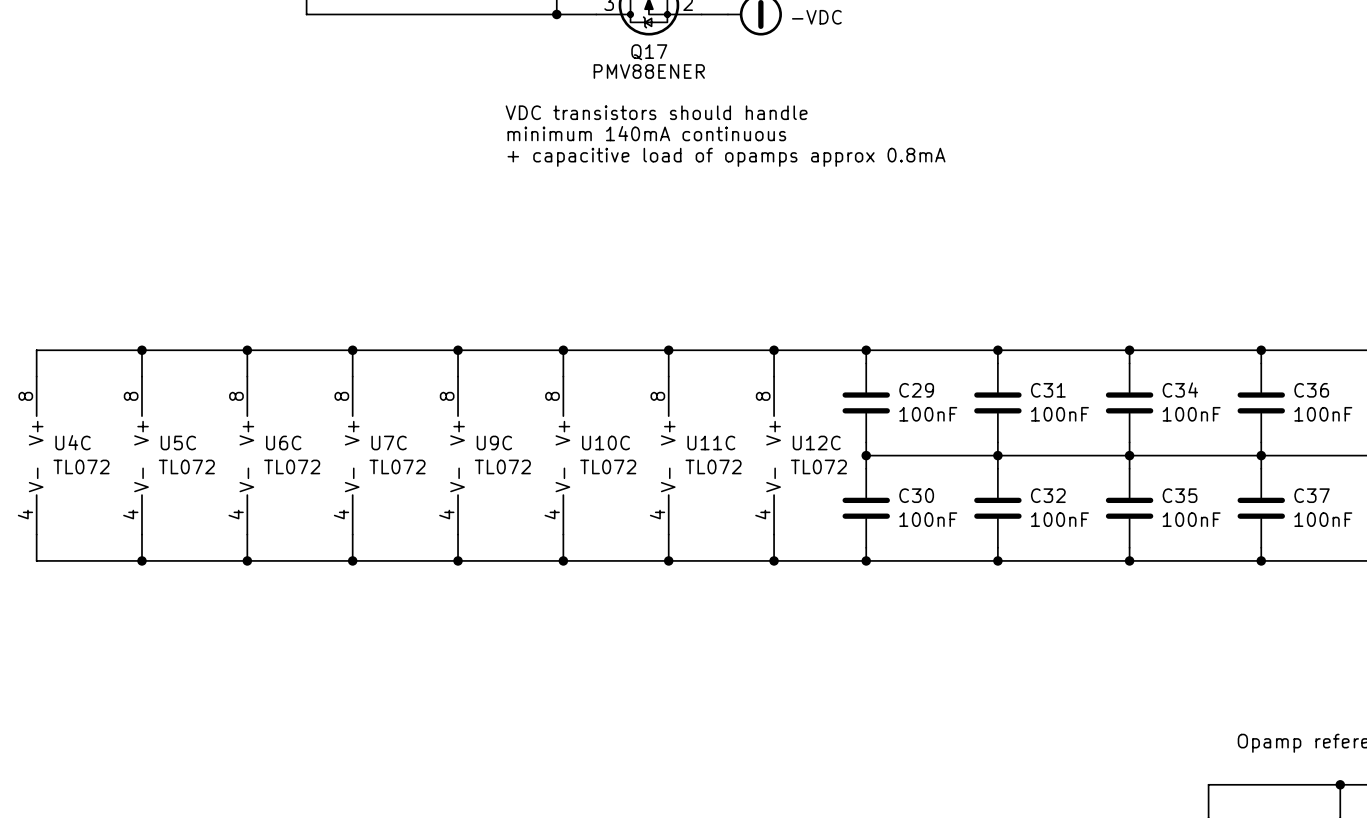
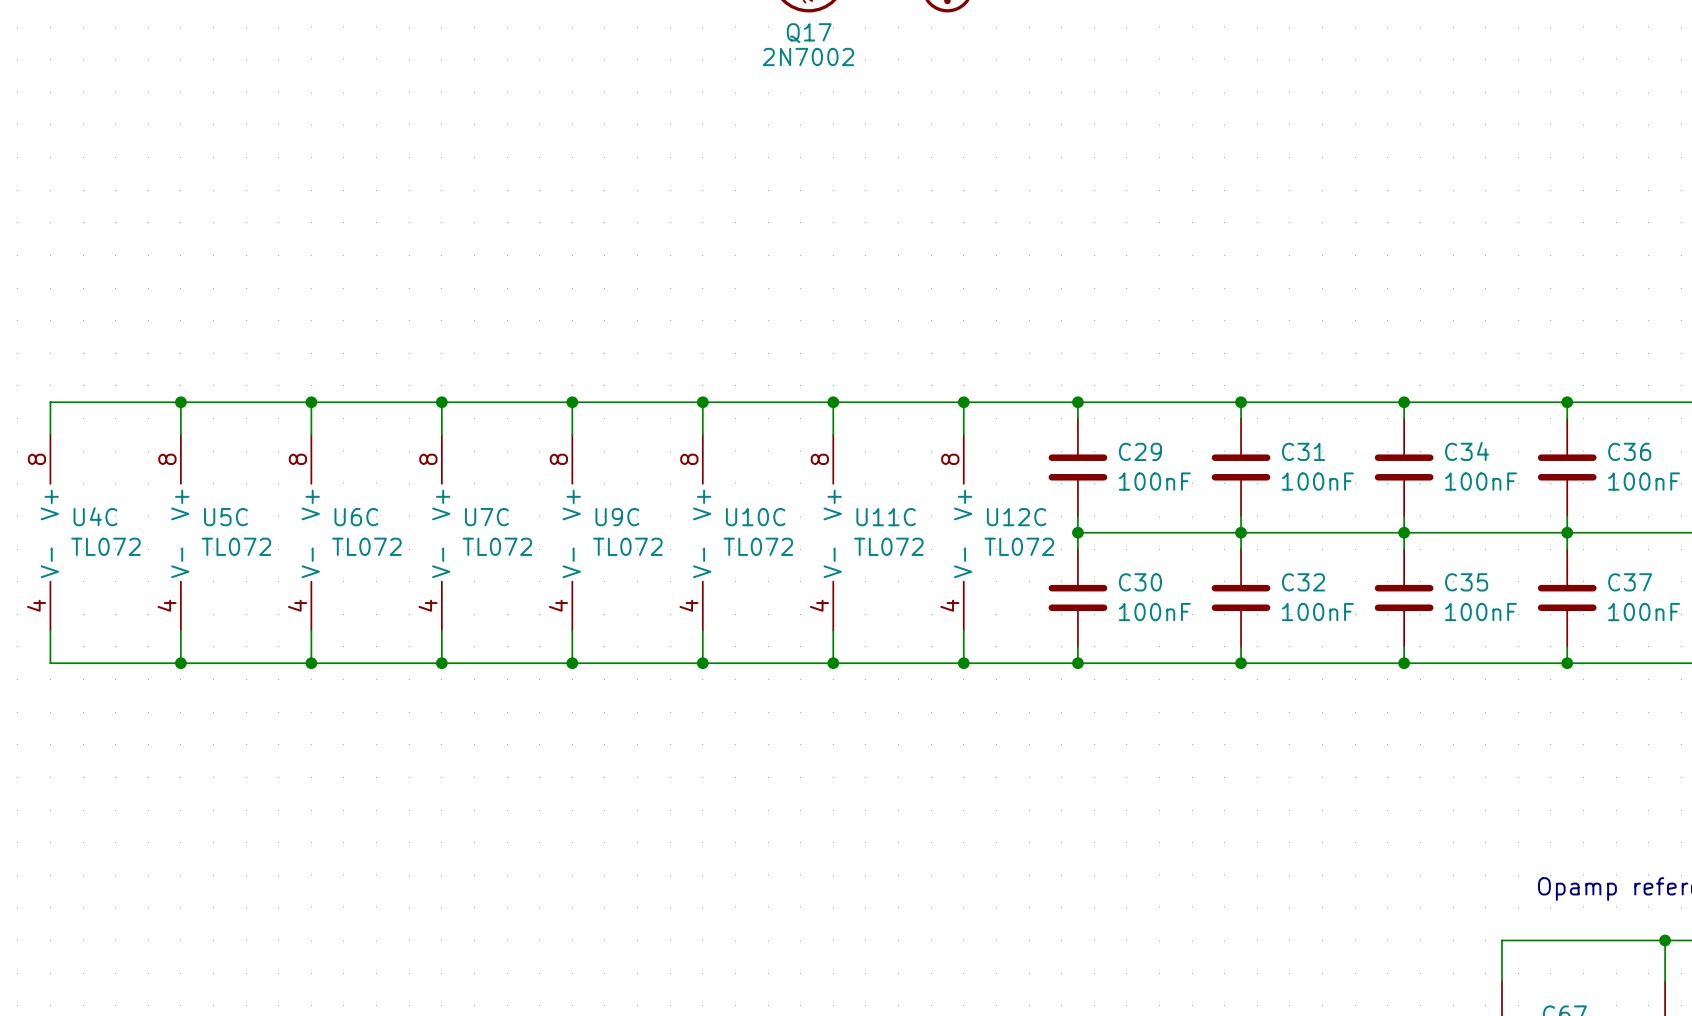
Q17 value: PMV88ENER (649, 71) -> 2N7002 (808, 57)
text: VDC transistors should handle (656, 112) -> none
text: minimum 140mA continuous (646, 133) -> none
text: + capacitive load of opamps approx 0.8mA (726, 157) -> none

